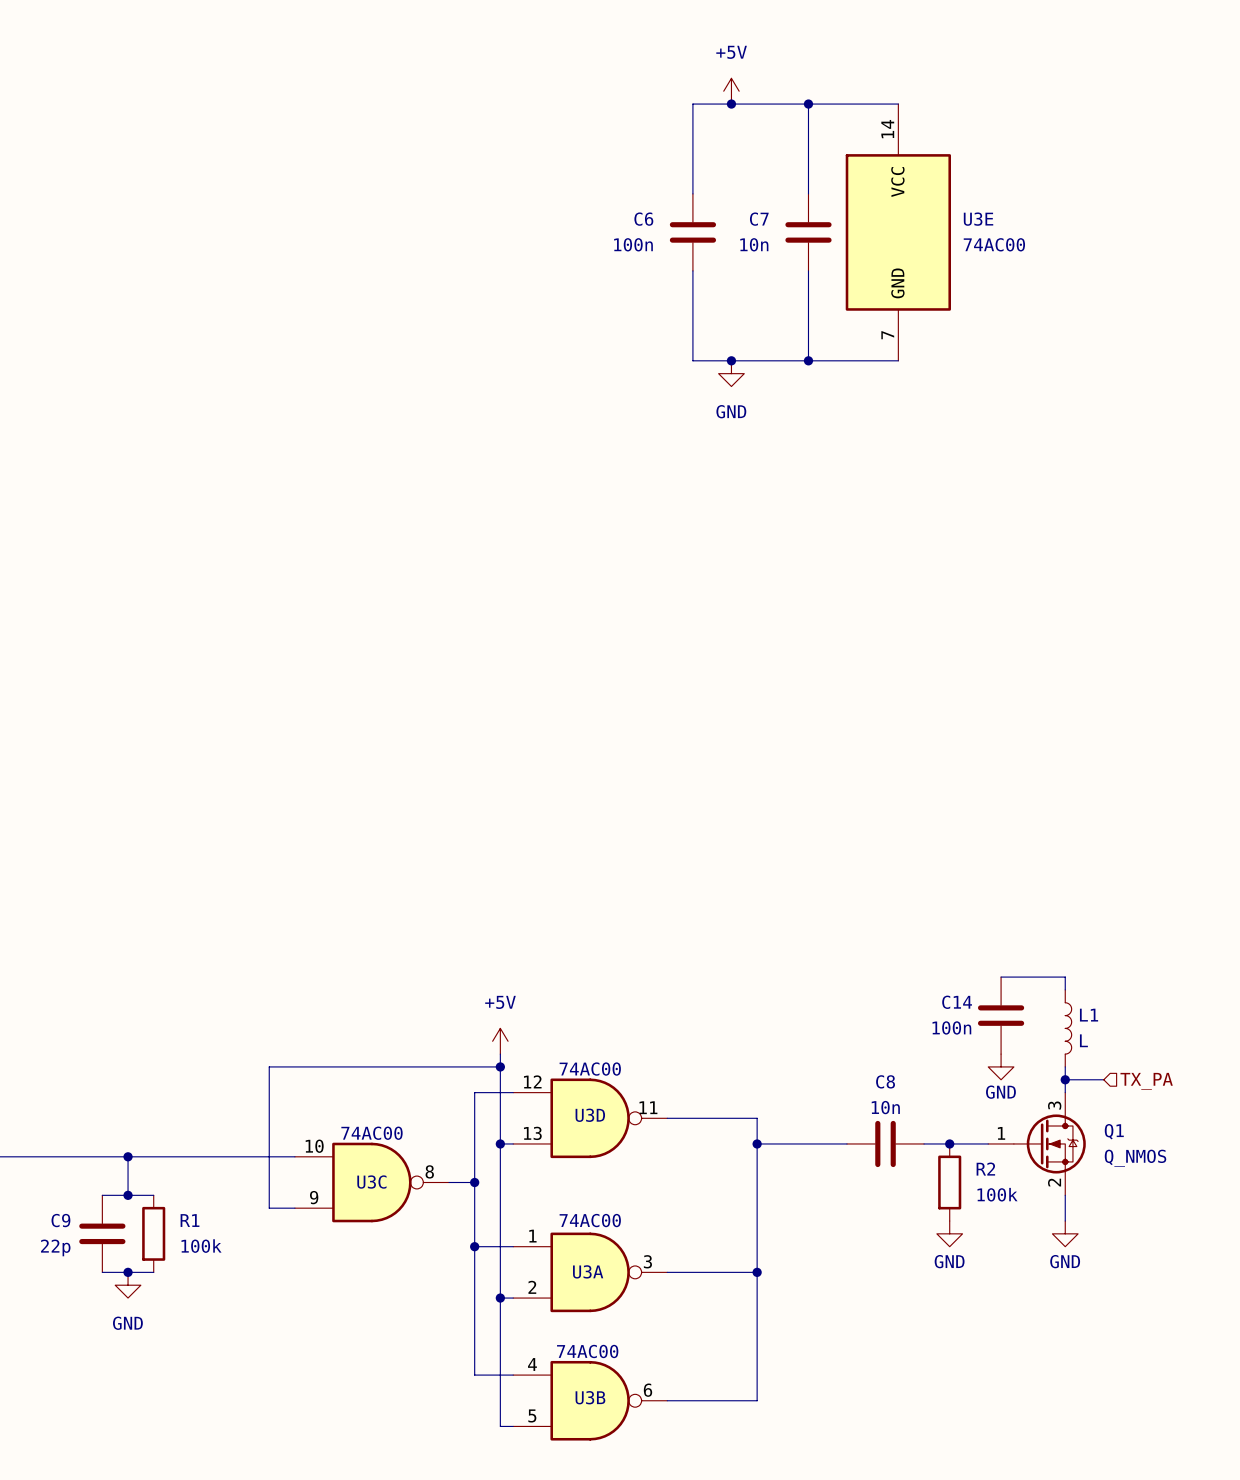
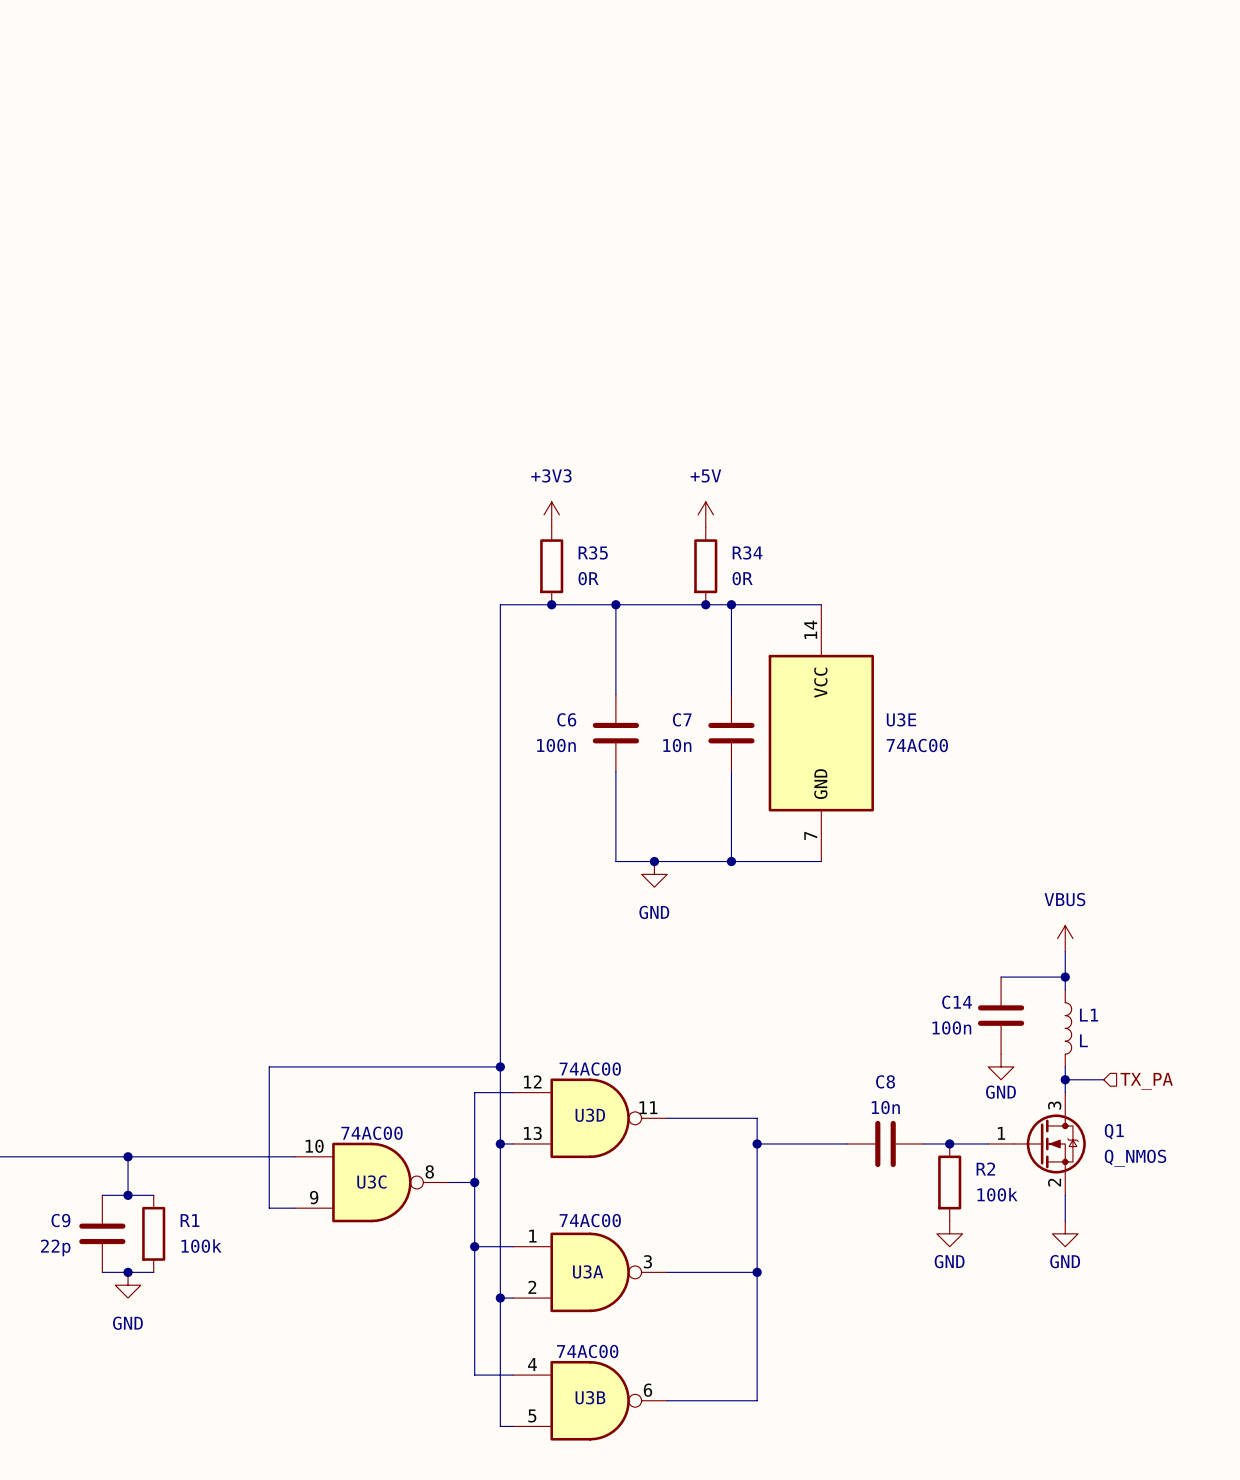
power symbol: +5V (731, 91) -> none
junction: (731, 104) -> none
wire: (808, 104) (808, 193) -> none
junction: (808, 104) -> none
wire: (898, 104) (692, 104) (692, 193) -> none
C6 position: (692, 232) -> (615, 733)
C7 position: (808, 232) -> (731, 733)
U3E position: (898, 232) -> (821, 733)
wire: (692, 270) (692, 360) (898, 360) -> none
wire: (808, 270) (808, 360) -> none
junction: (731, 360) -> none
junction: (808, 360) -> none
power symbol: GND (731, 373) -> none
power symbol: none -> +3V3 (551, 514)
power symbol: none -> +5V (705, 514)
R35: none -> 0R (551, 566)
R34: none -> 0R (705, 566)
junction: none -> (551, 604)
wire: none -> (615, 604) (615, 694)
junction: none -> (615, 604)
junction: none -> (705, 604)
wire: none -> (731, 604) (731, 694)
junction: none -> (731, 604)
wire: none -> (821, 604) (500, 604) (500, 1054)
wire: none -> (615, 771) (615, 861) (821, 861)
wire: none -> (731, 771) (731, 861)
junction: none -> (654, 861)
junction: none -> (731, 861)
power symbol: none -> GND (654, 874)
power symbol: none -> VBUS (1065, 938)
wire: none -> (1065, 951) (1065, 977)
junction: none -> (1065, 977)
power symbol: +5V (500, 1041) -> none

